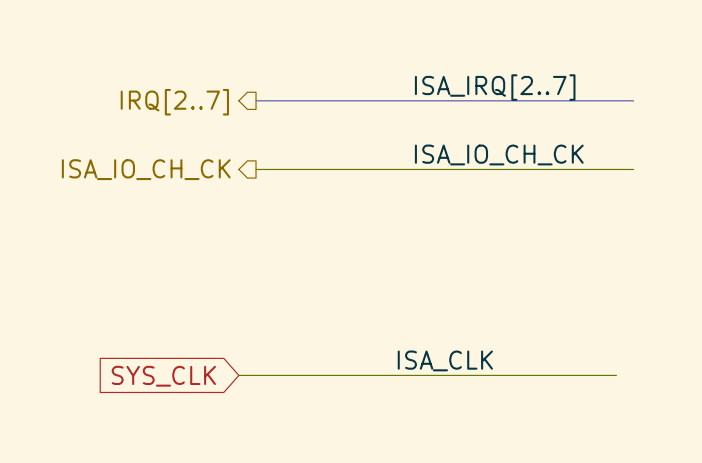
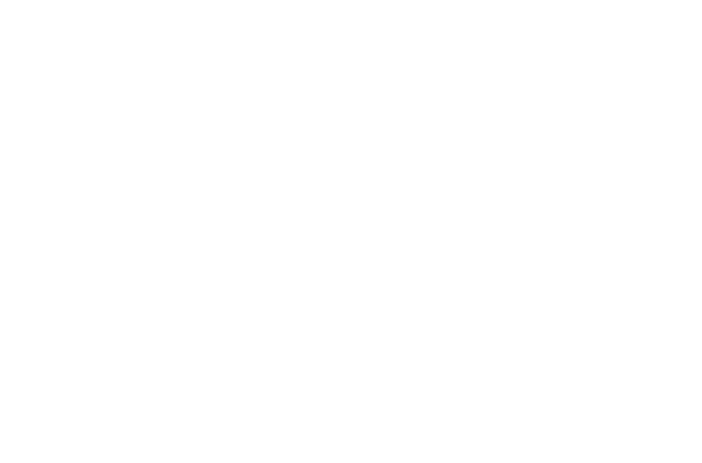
label: ISA_IRQ[2..7] (495, 87) -> none
bus: (256, 100) (633, 100) -> none
hierarchical label: IRQ[2..7] (174, 102) -> none
label: ISA_IO_CH_CK (499, 154) -> none
hierarchical label: ISA_IO_CH_CK (146, 169) -> none
wire: (256, 169) (633, 169) -> none
label: ISA_CLK (445, 360) -> none
wire: (238, 375) (616, 375) -> none
global label: SYS_CLK (163, 376) -> none

